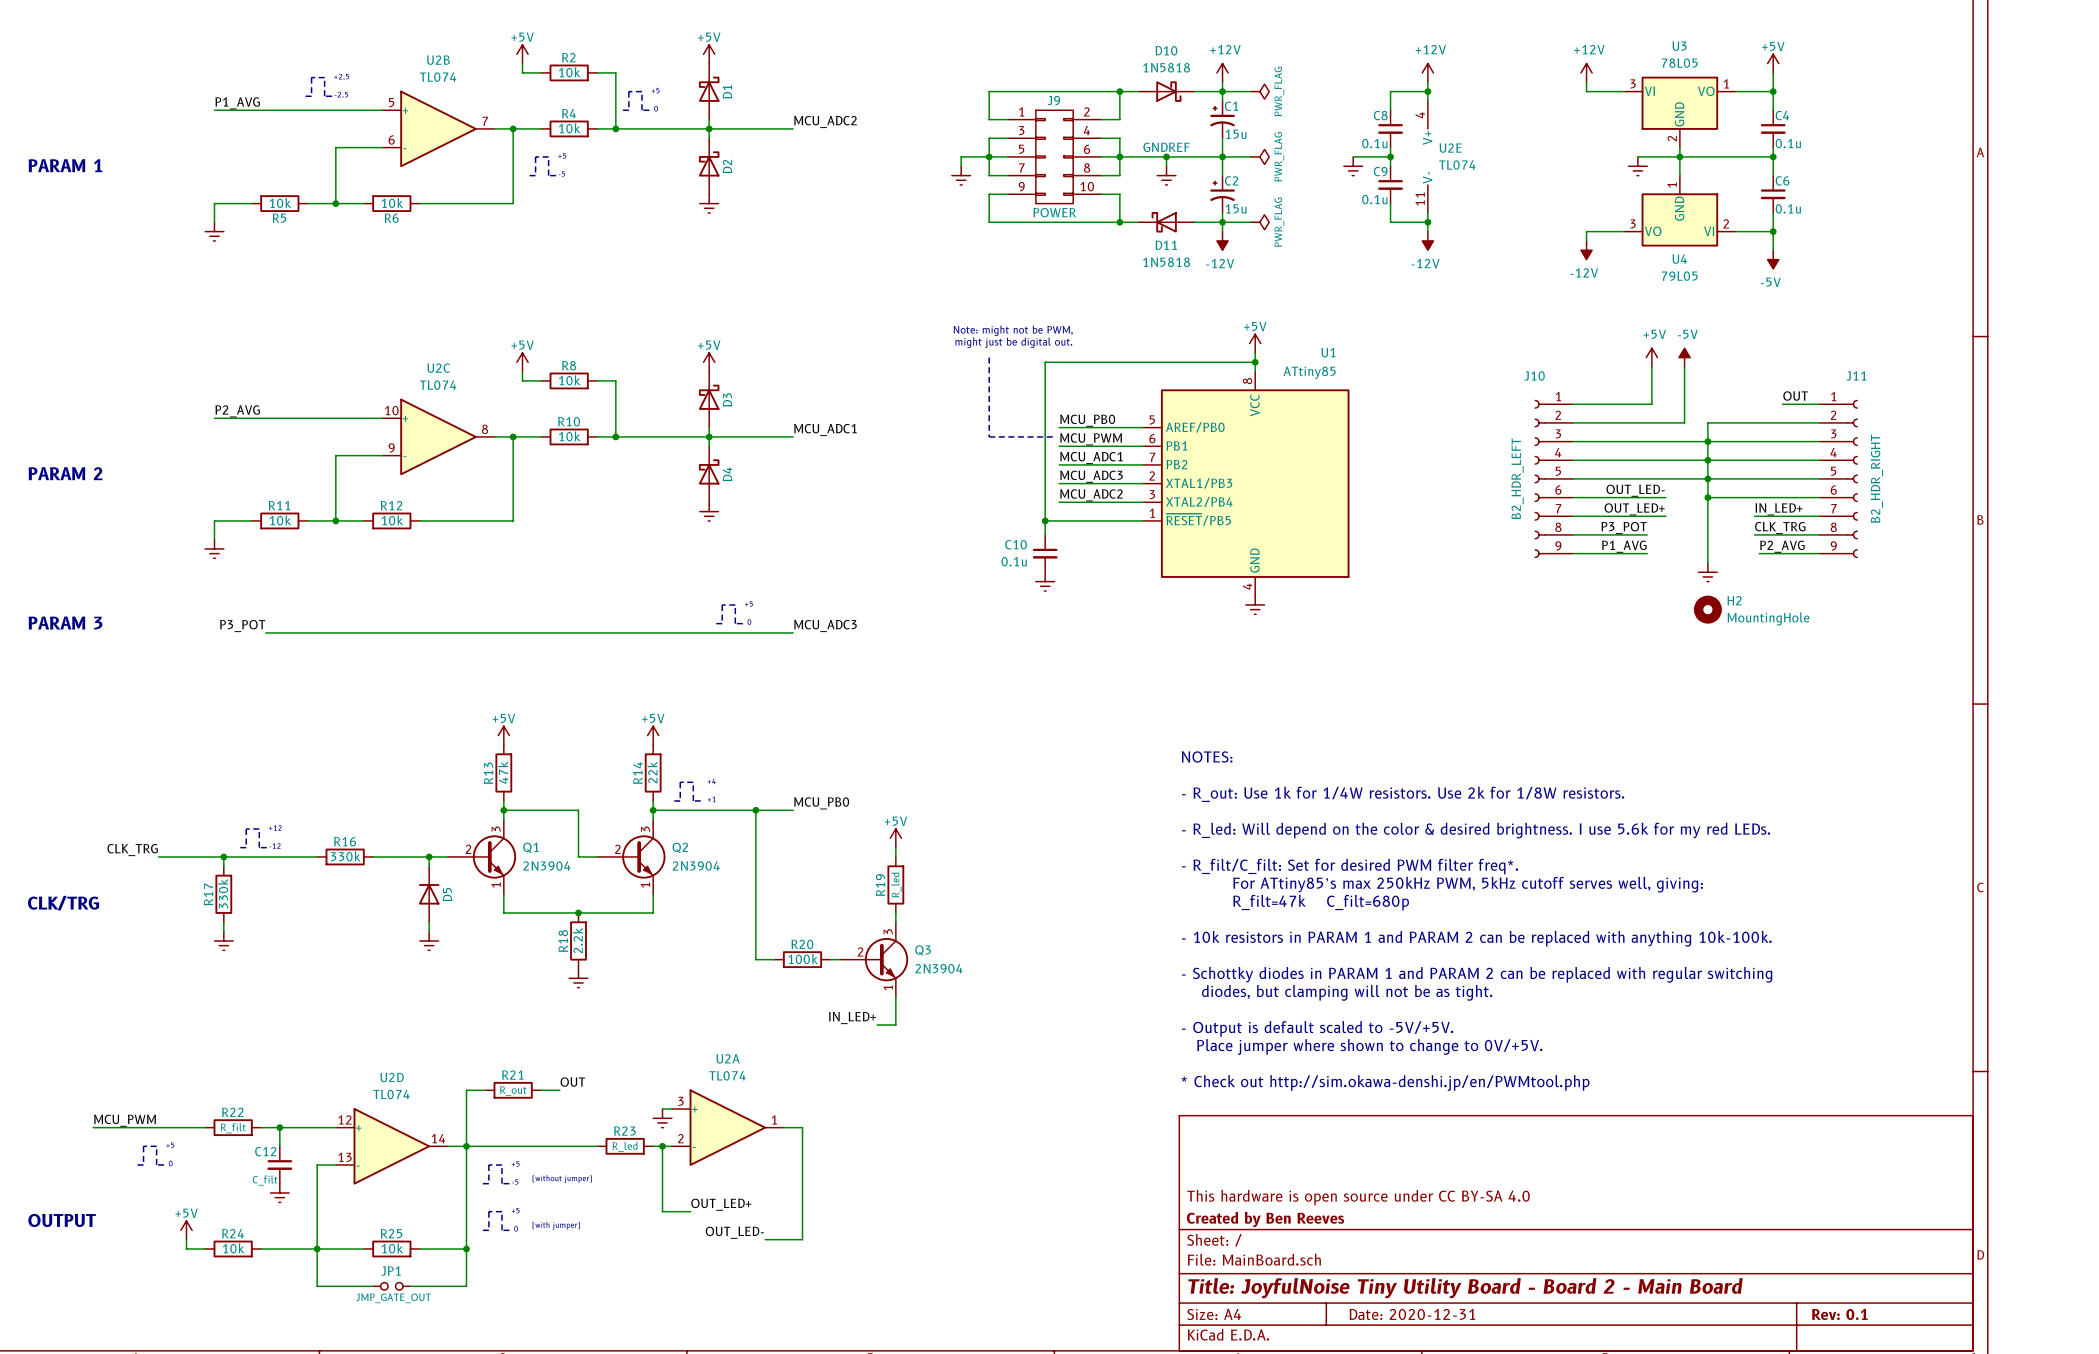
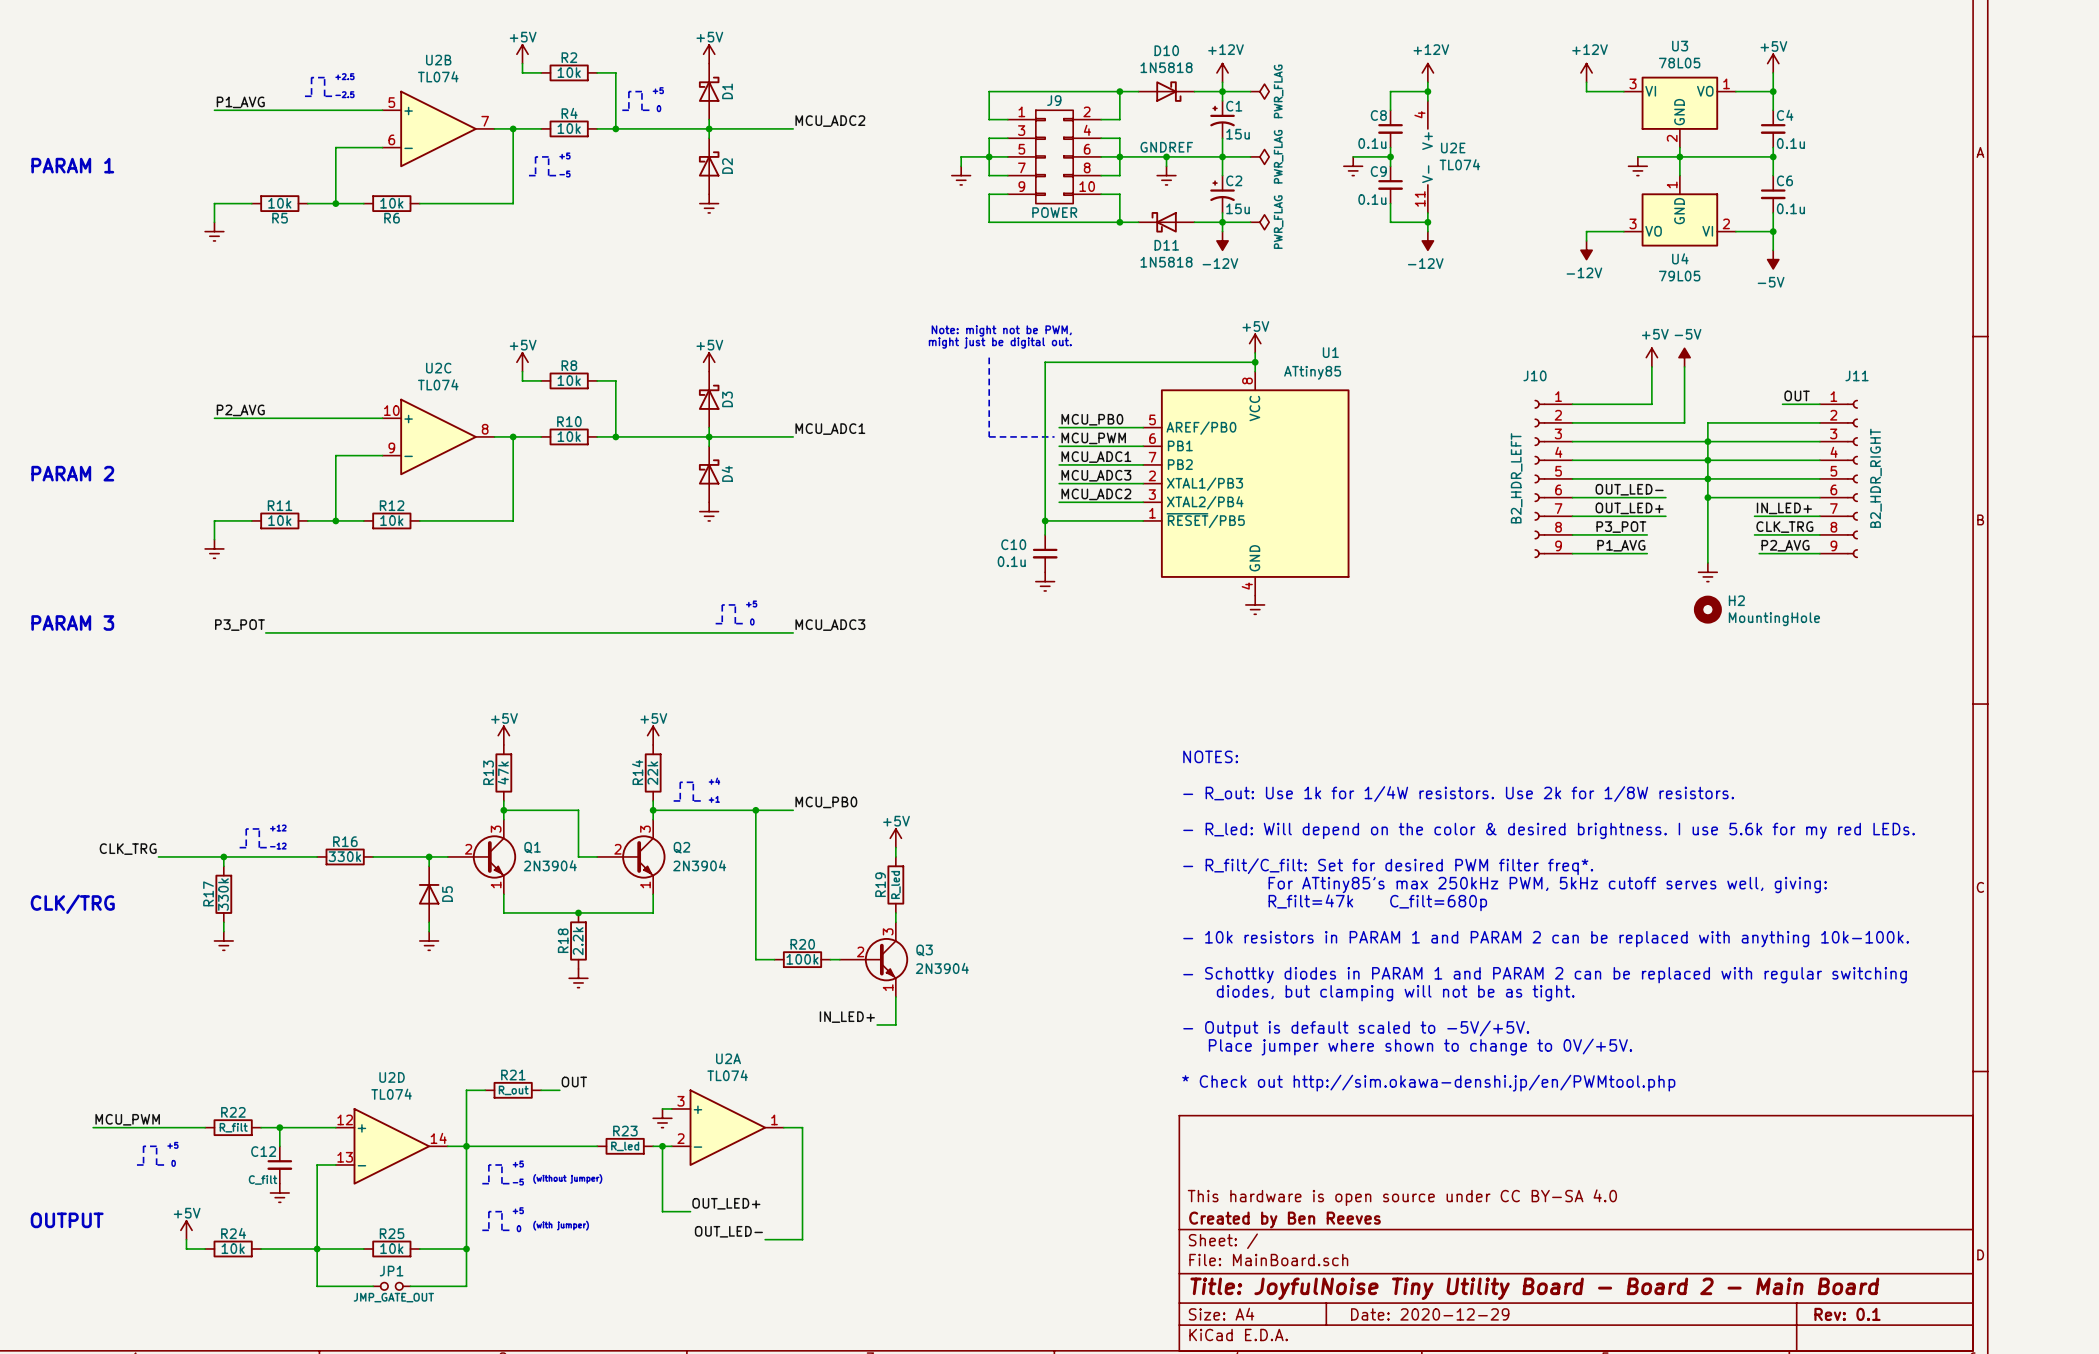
title block: Date: 2020-12-31 (1412, 1314) -> Date: 2020-12-29 (1430, 1314)

